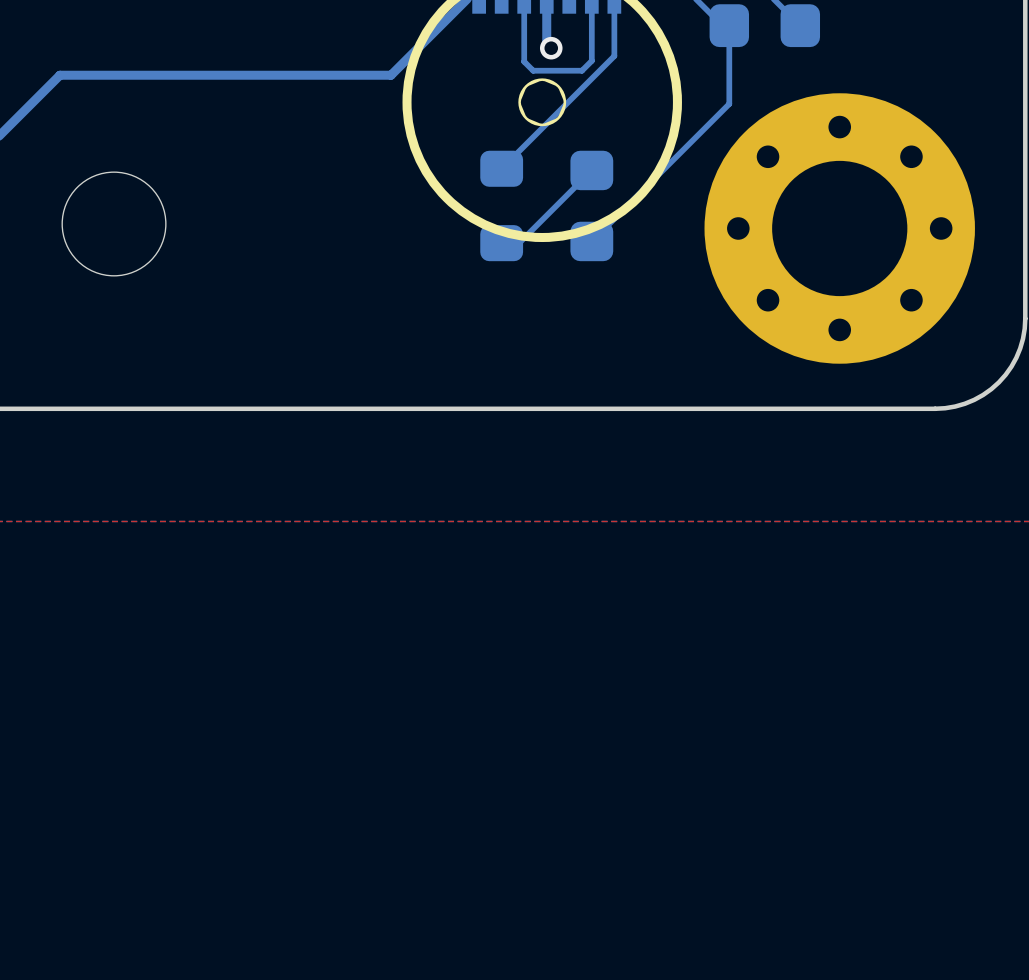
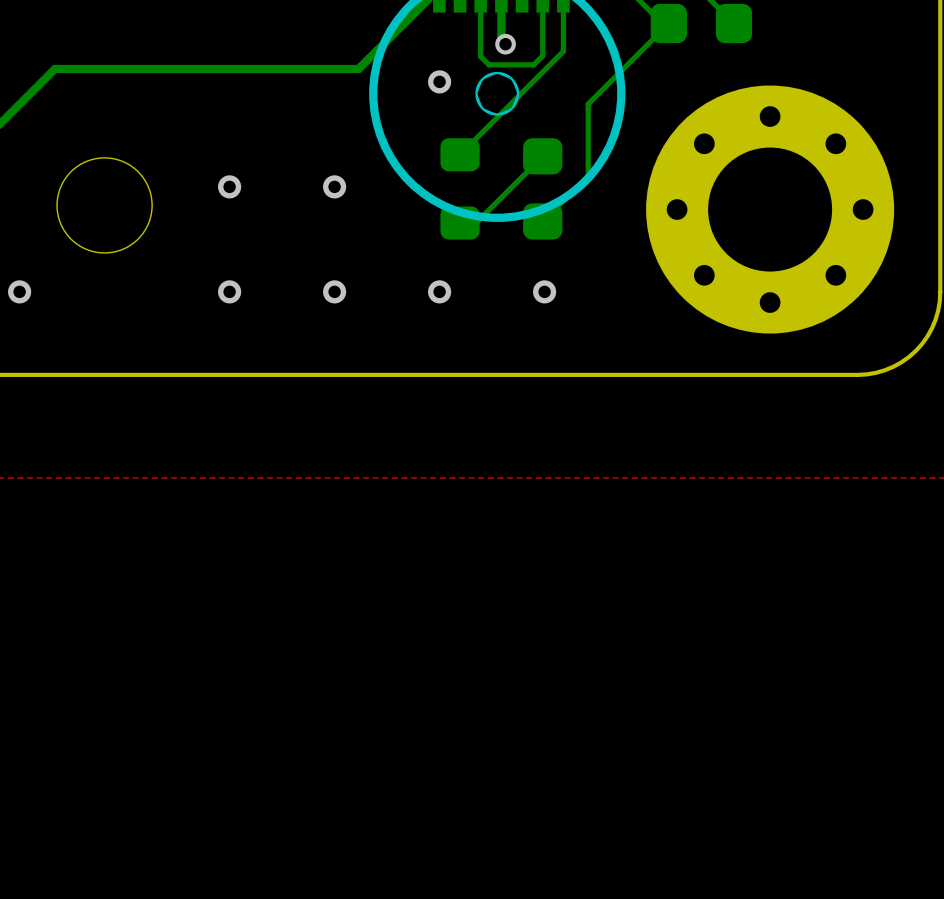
bottom track: (729, 25) (729, 103) (641, 191) -> (668, 23) (588, 104) (588, 175)
via: none -> (439, 81)
via: none -> (229, 186)
via: none -> (334, 186)
via: none -> (19, 291)
via: none -> (229, 291)
via: none -> (334, 291)
via: none -> (439, 291)
via: none -> (544, 291)

